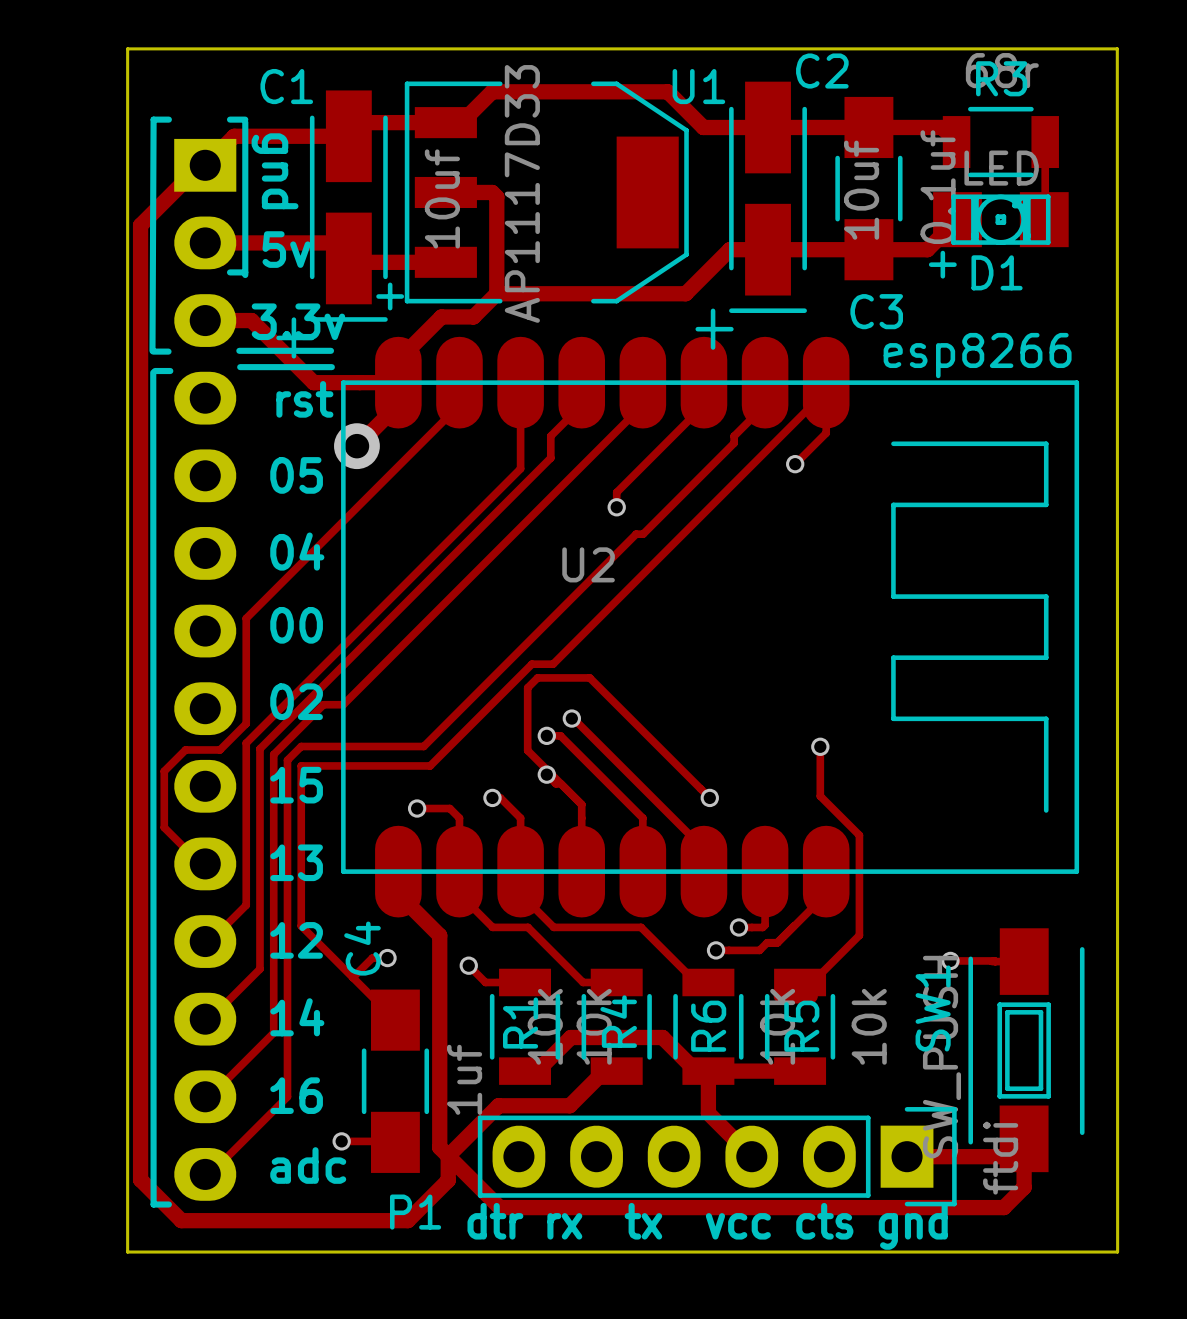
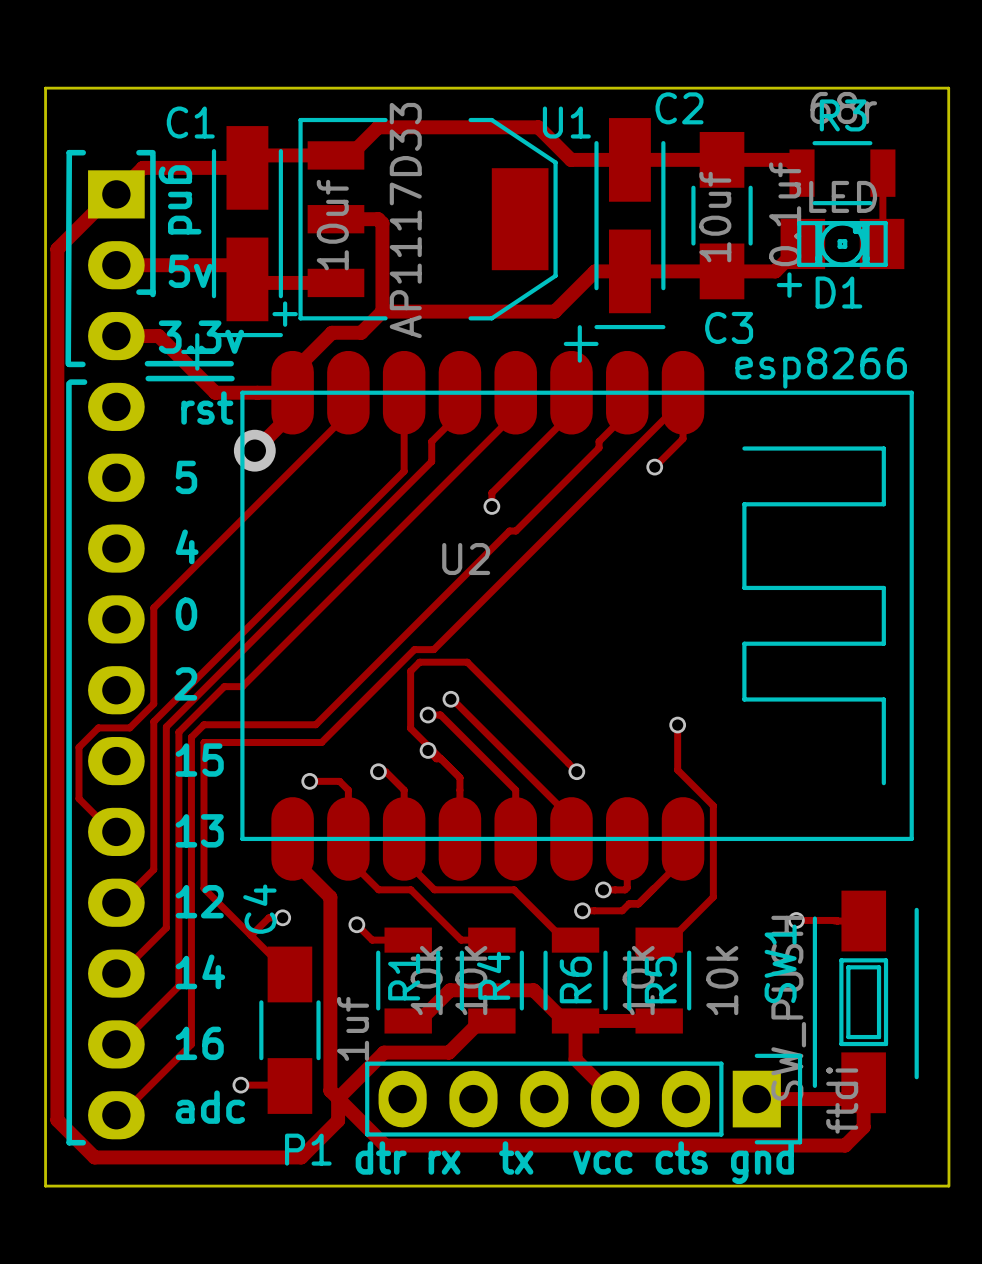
text: 05 (296, 475) -> 5 (186, 477)
text: 04 (297, 551) -> 4 (187, 546)
text: 00 (296, 625) -> 0 (186, 614)
text: 02 (296, 701) -> 2 (185, 683)

